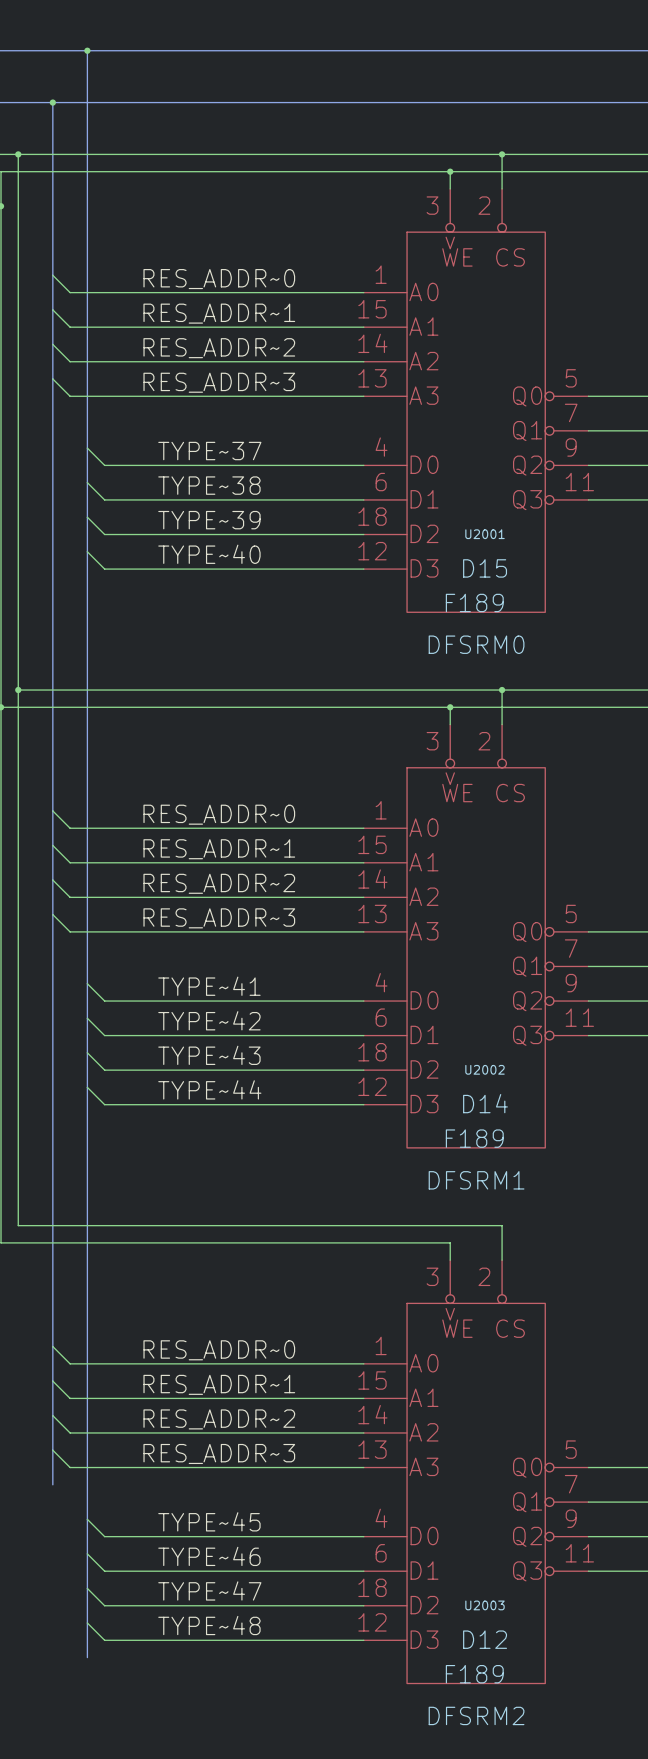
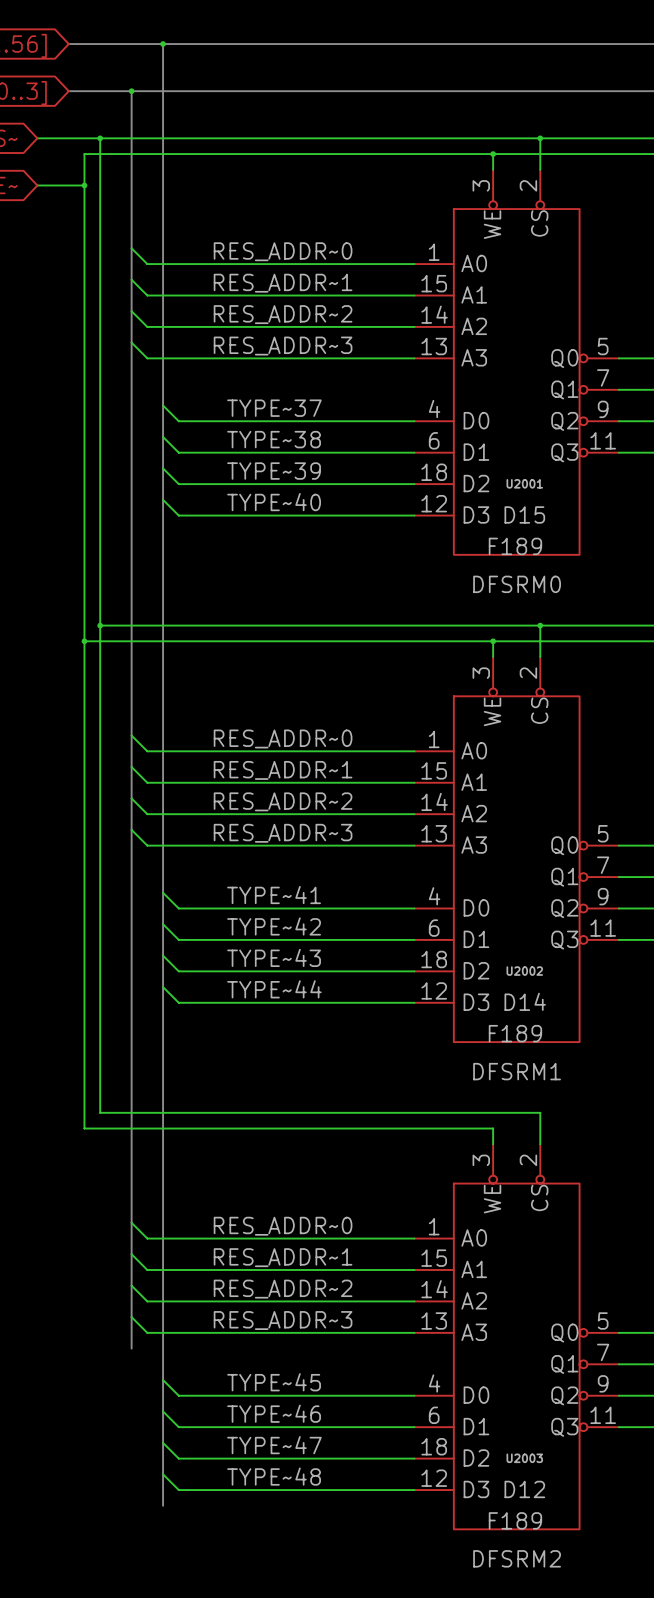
U2001 symbol: [363, 188, 589, 613] -> [414, 169, 619, 555]
U2002 symbol: [363, 724, 589, 1148] -> [414, 657, 619, 1043]
U2003 symbol: [363, 1260, 589, 1684] -> [414, 1144, 619, 1530]

